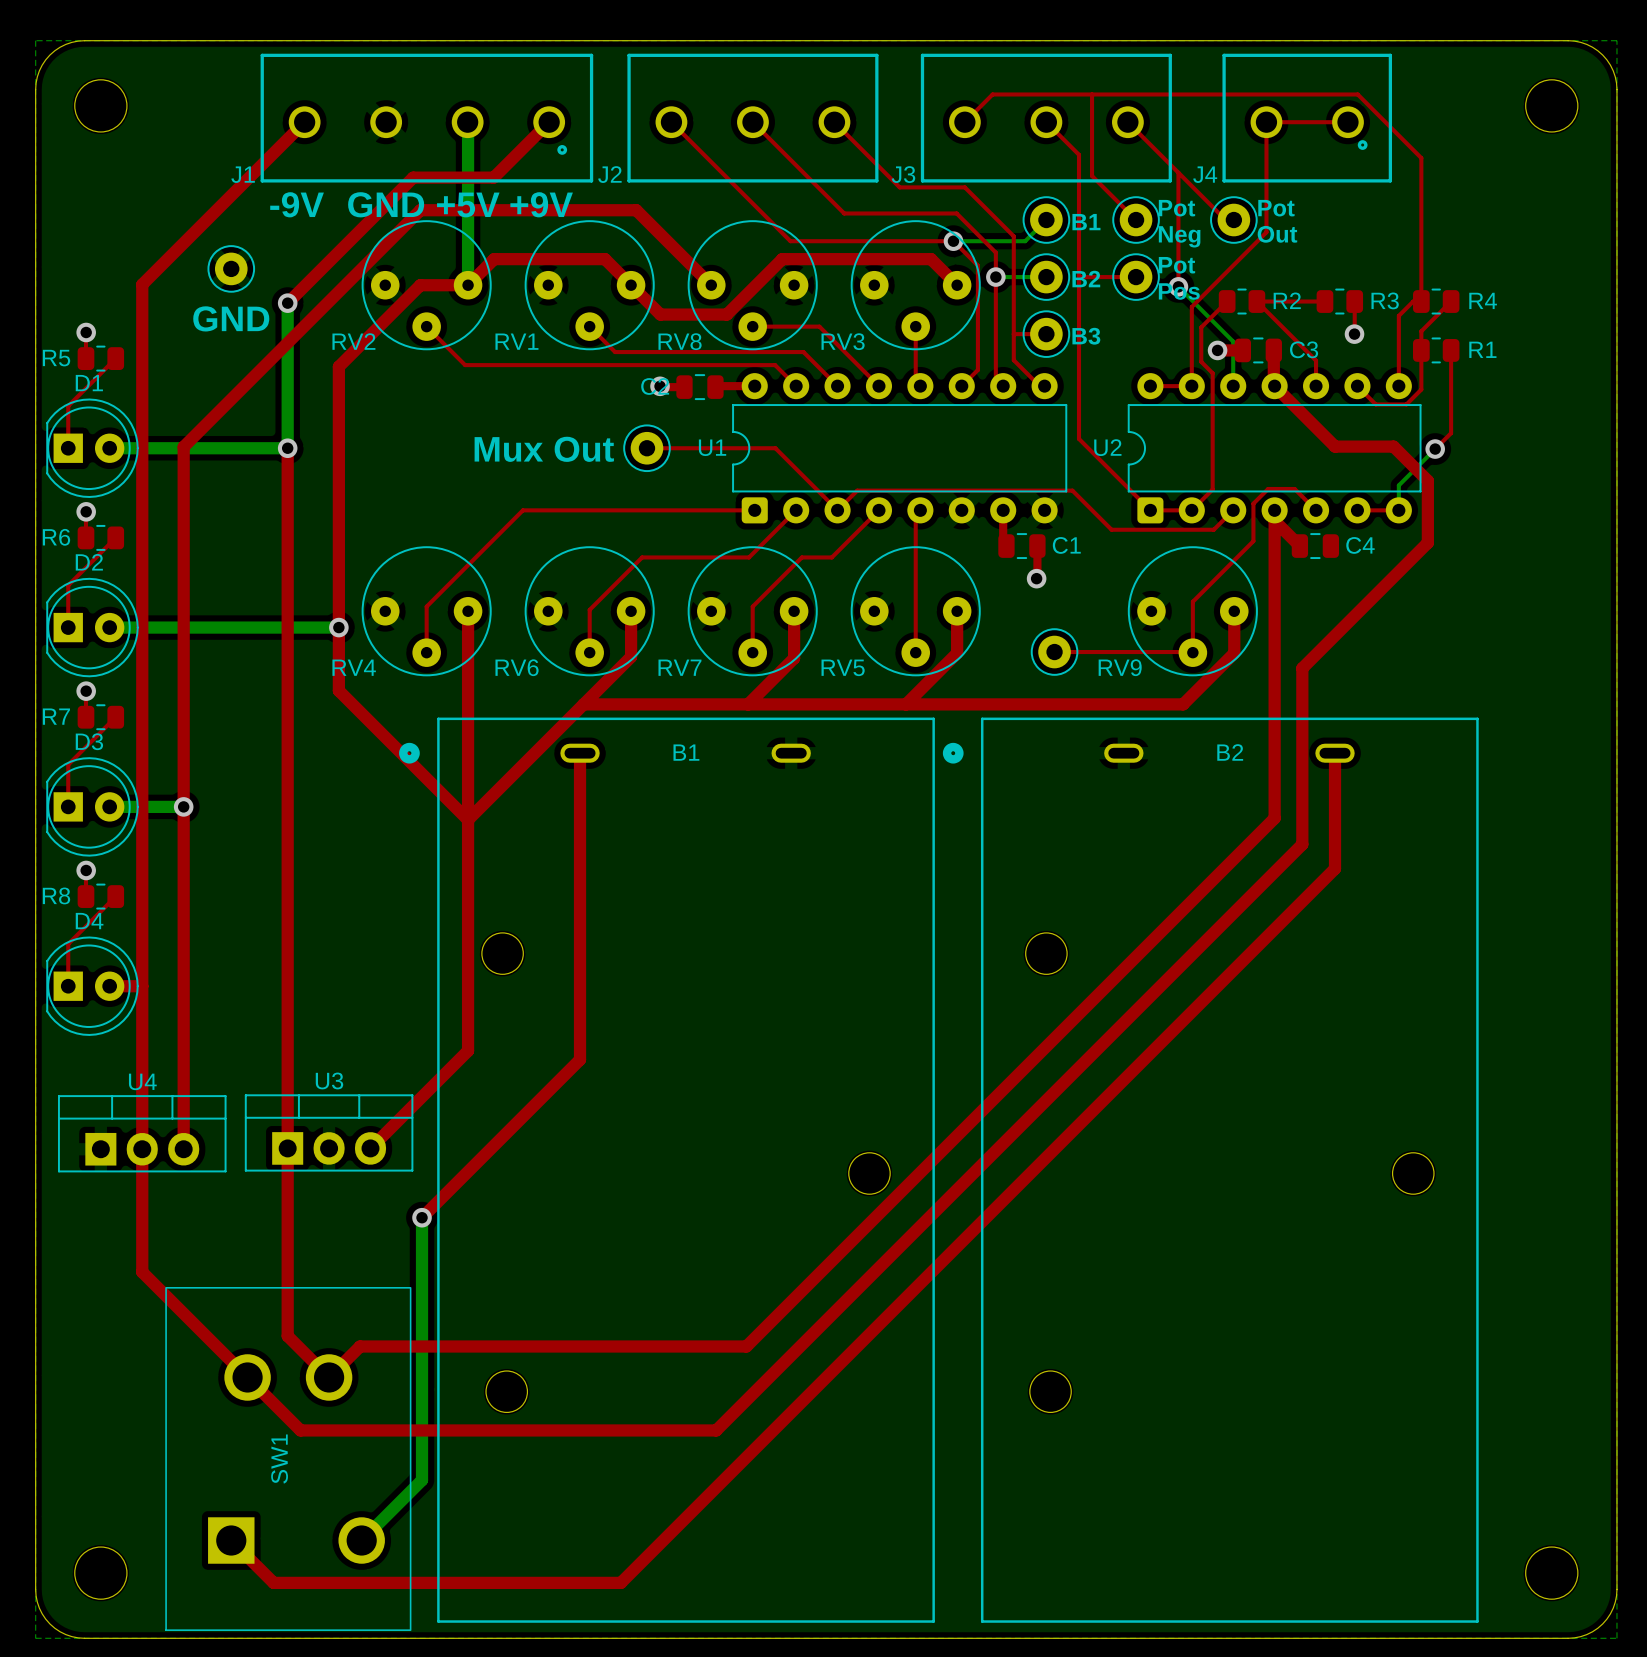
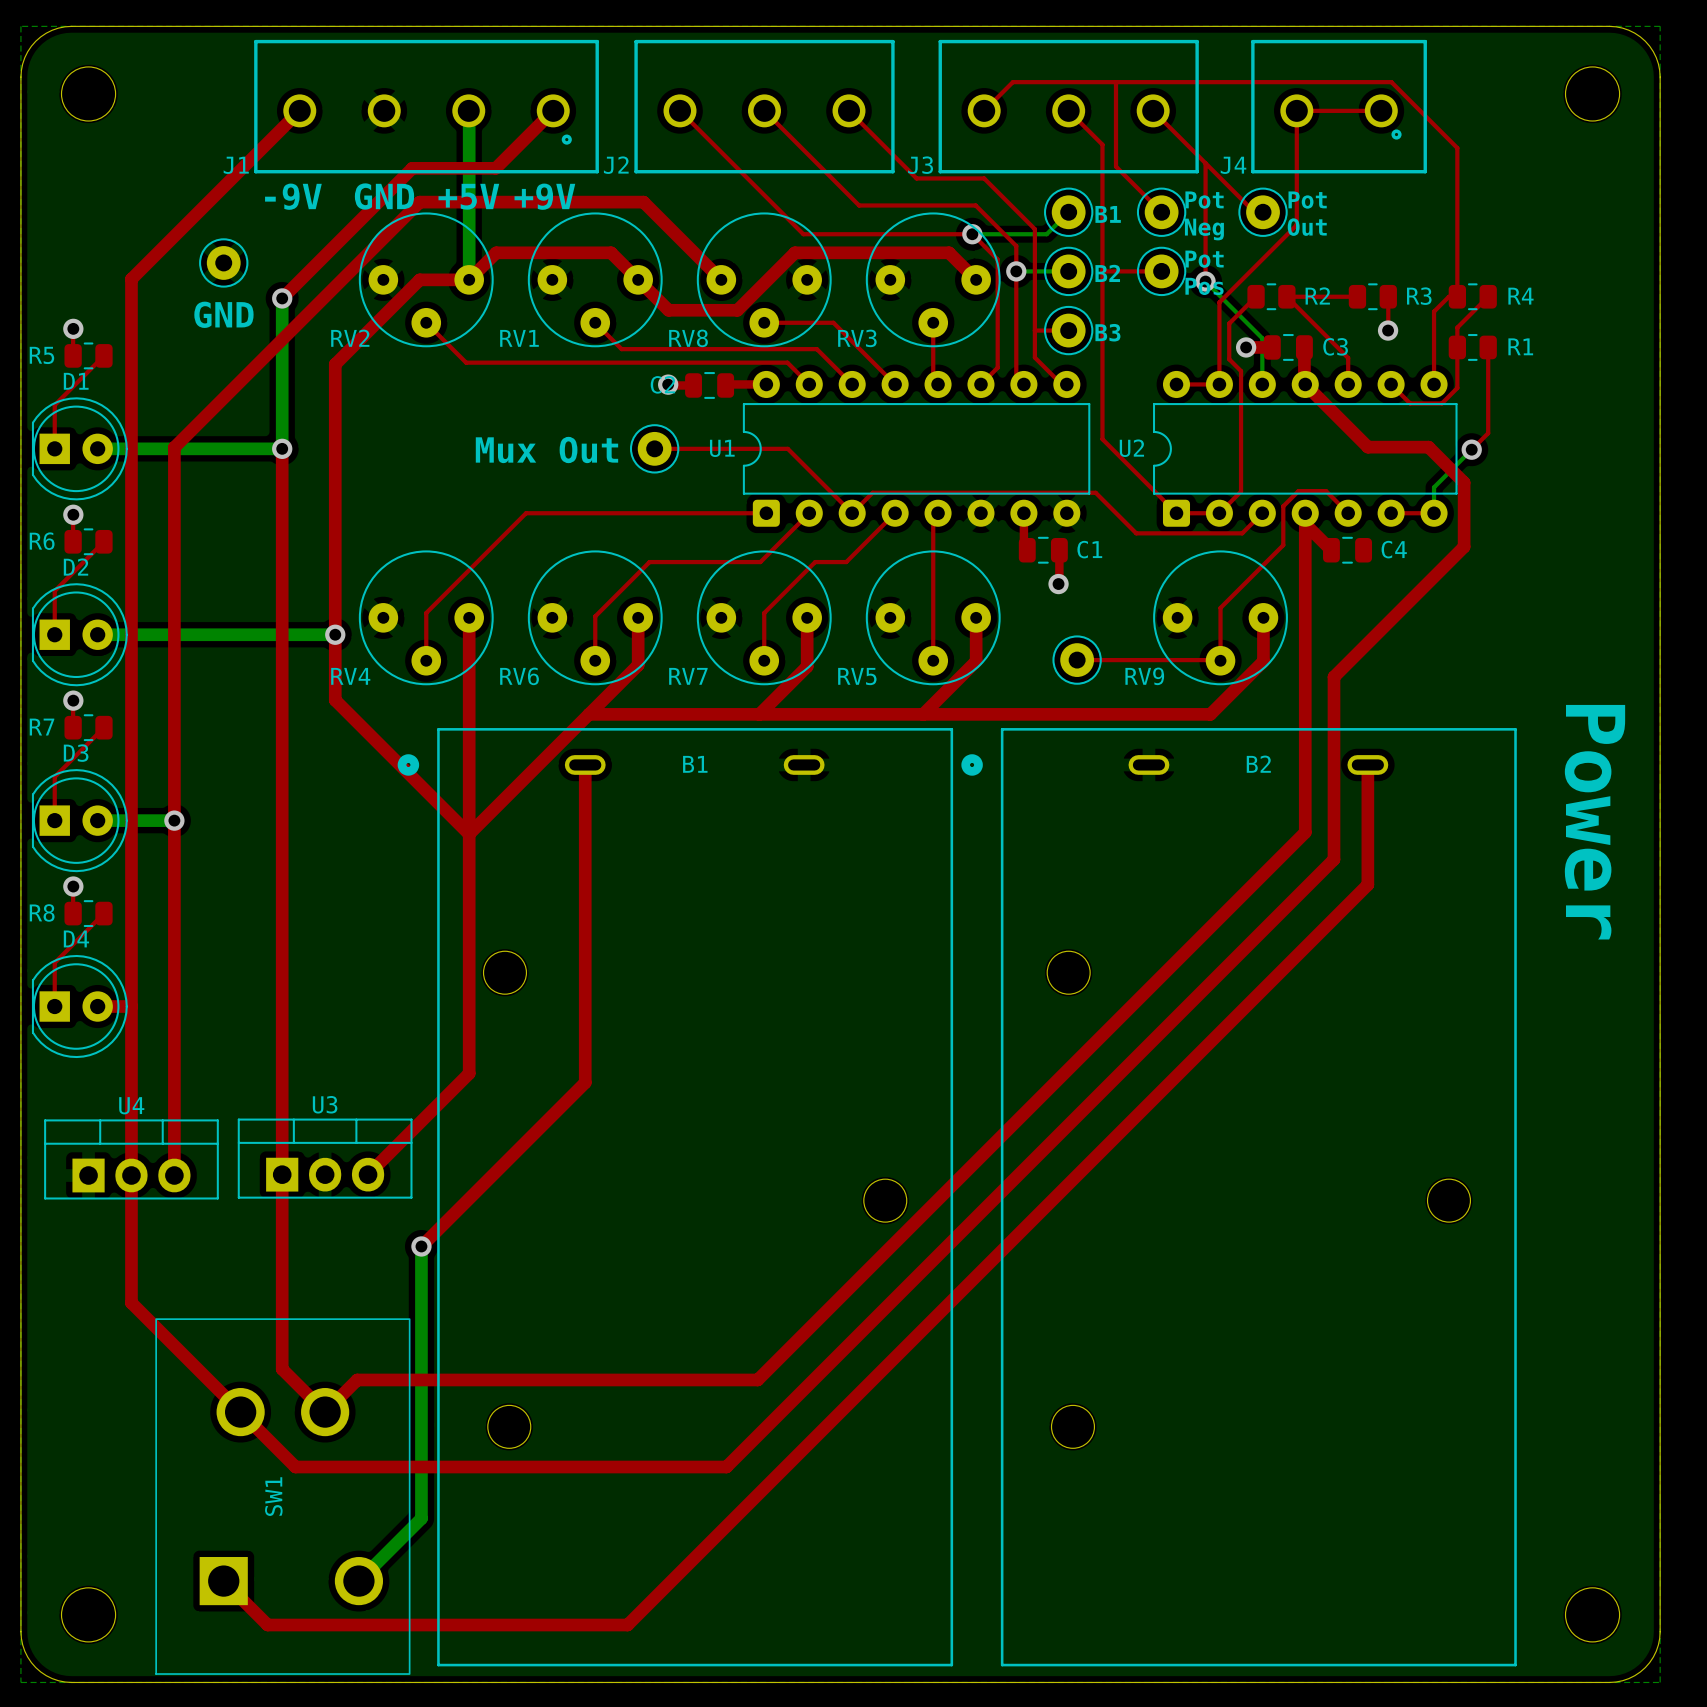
text: none -> Power (1594, 822)

